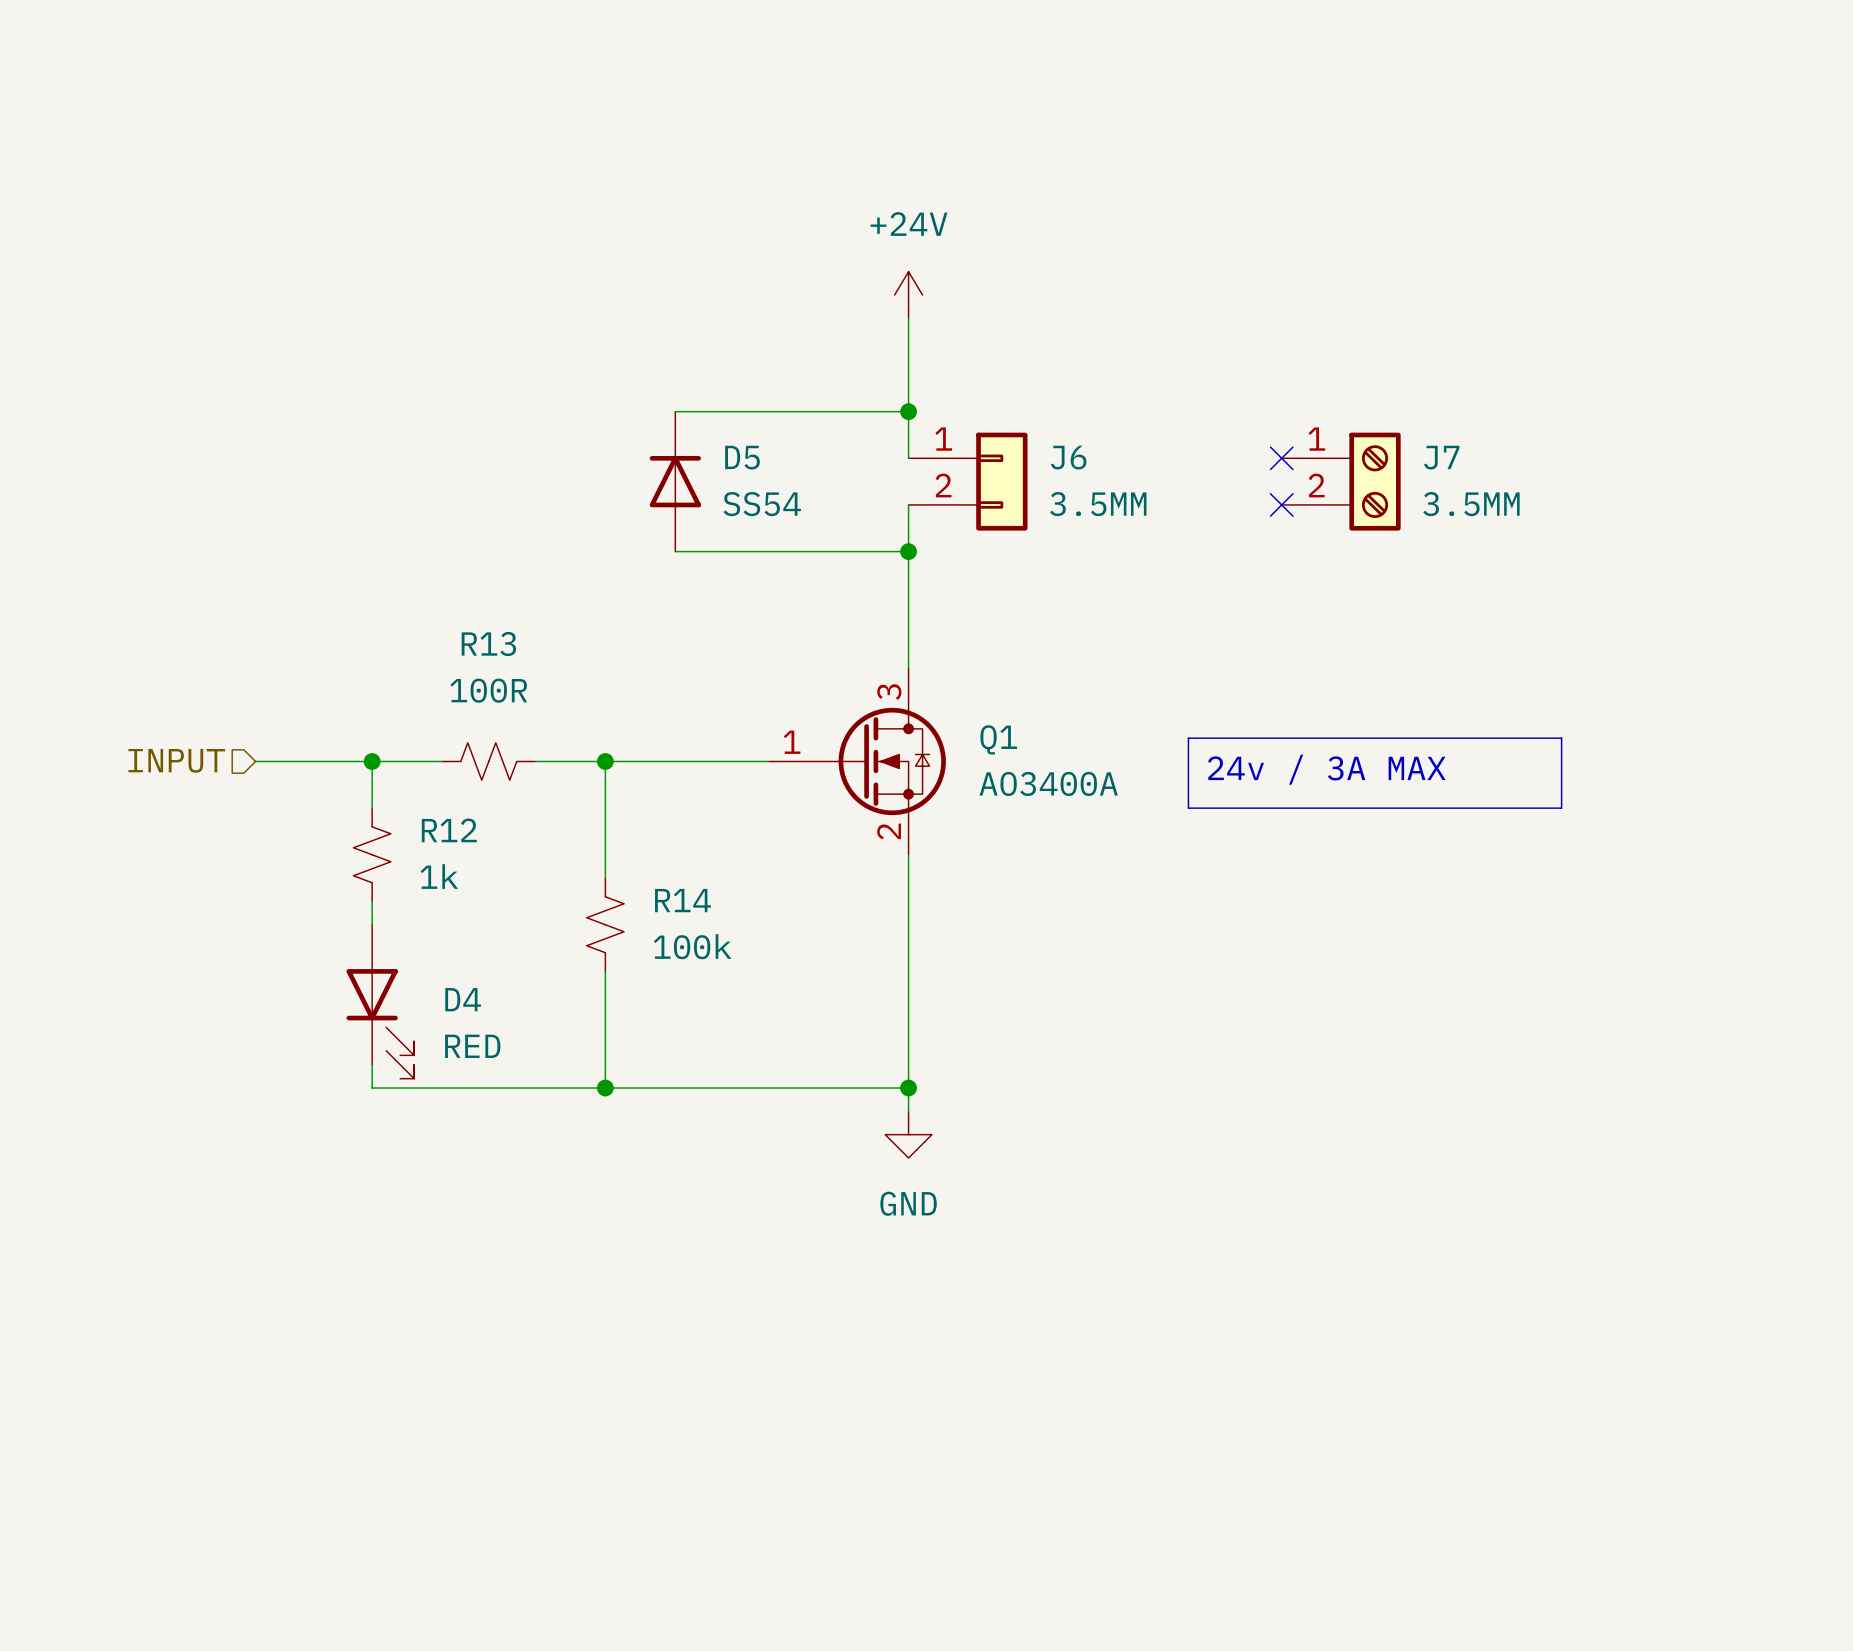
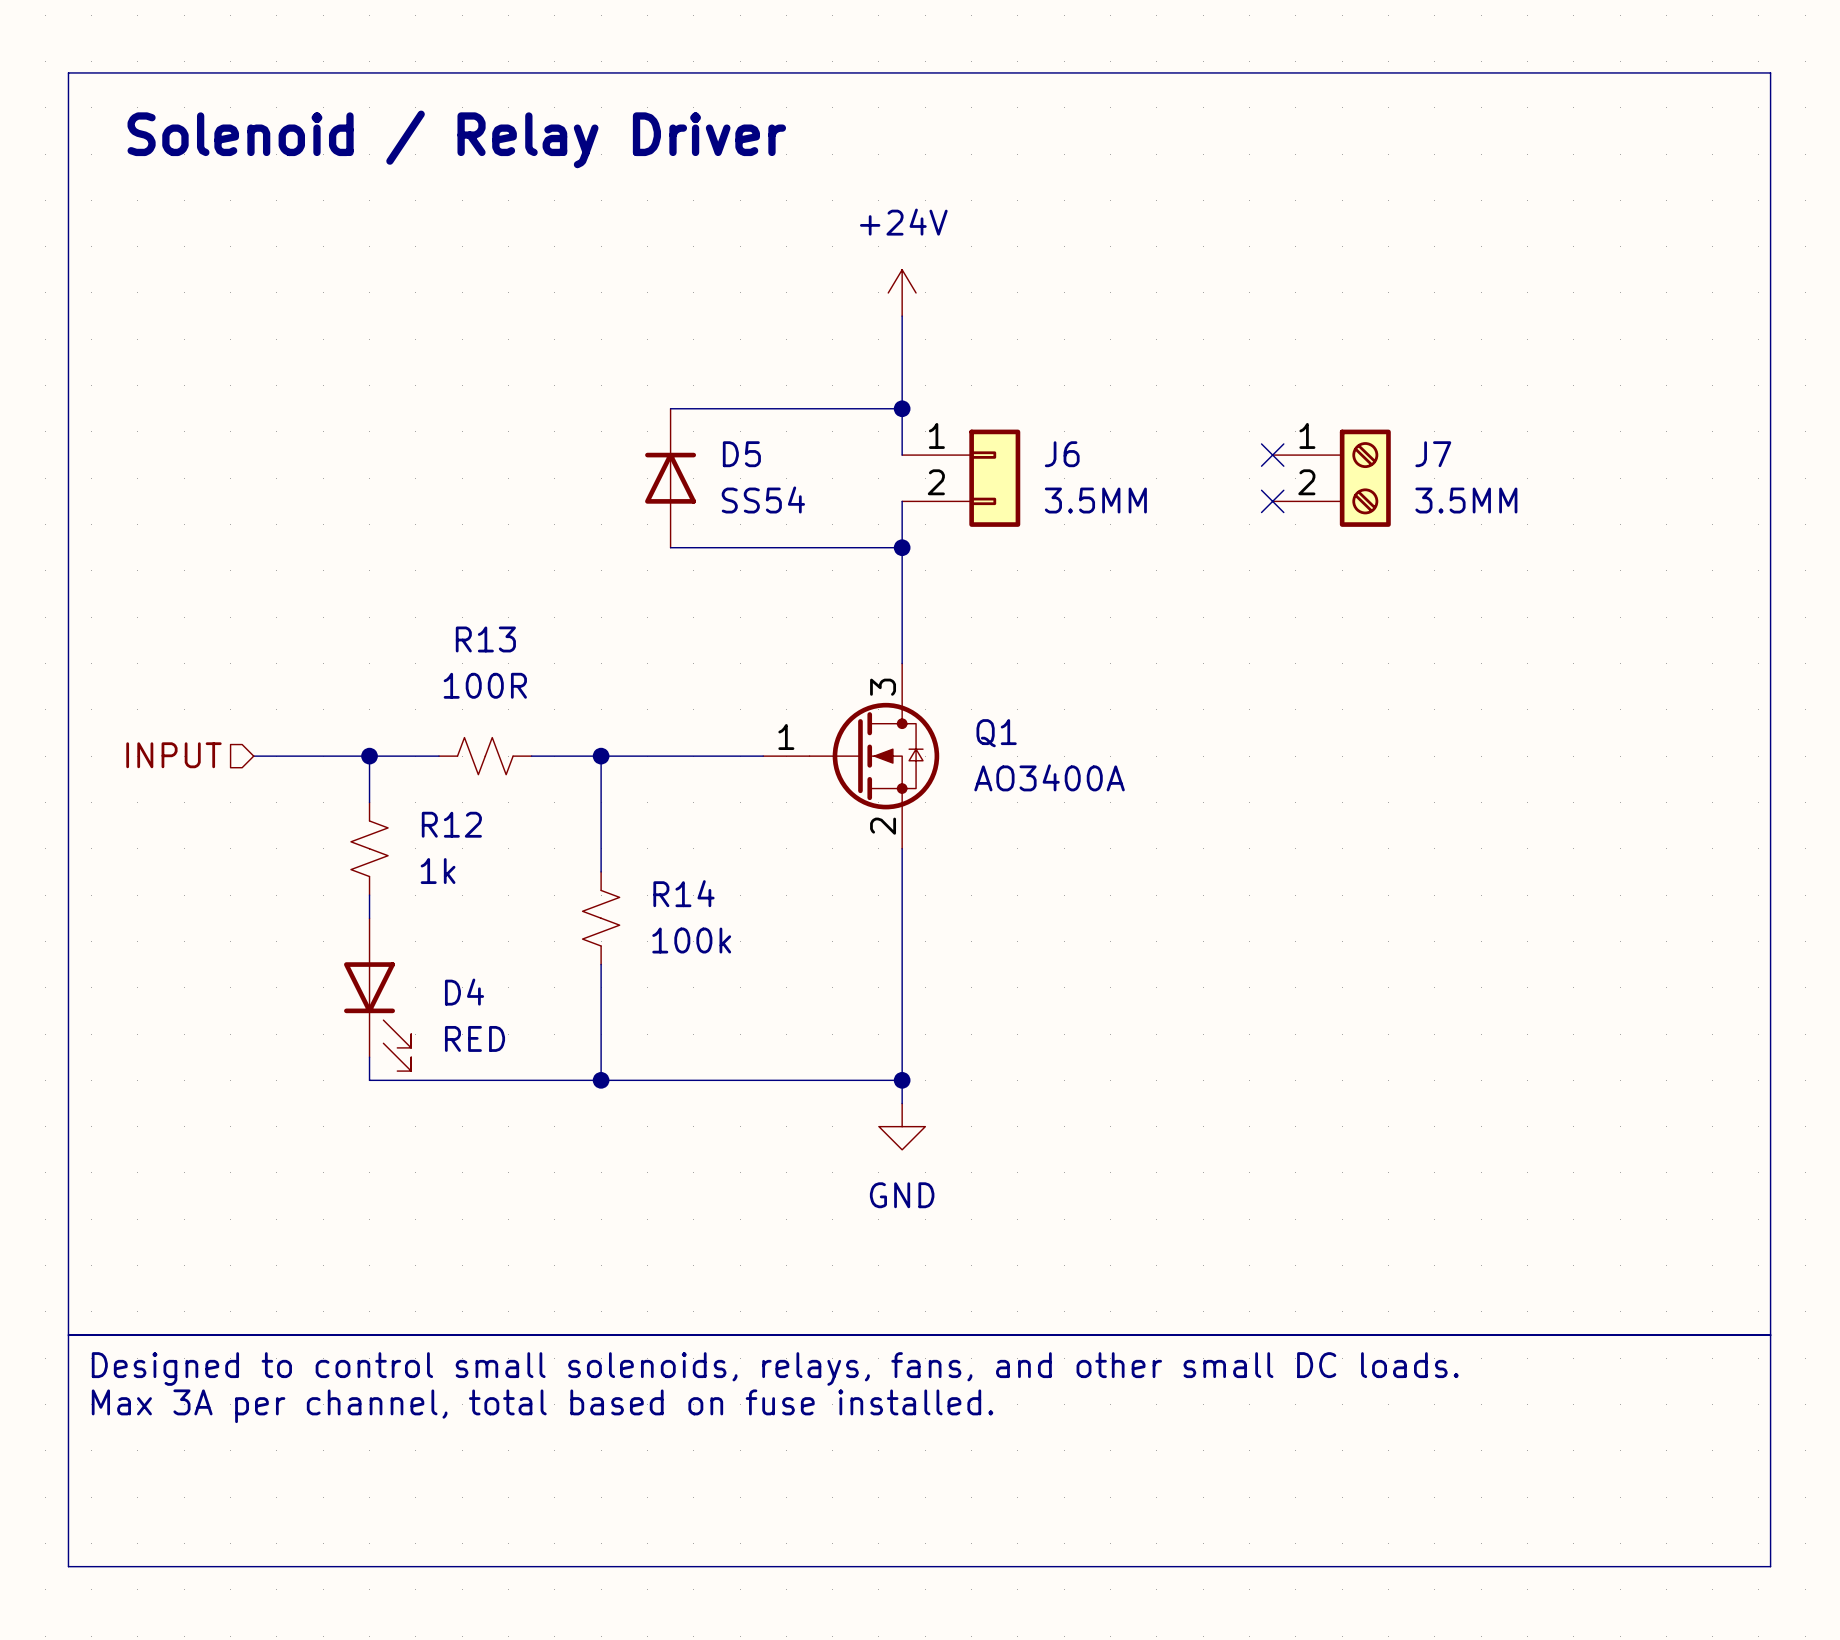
line: none -> (68, 72) (1770, 72) (1770, 1566) (68, 1566) (68, 72)
text: none -> Solenoid / Relay Driver (456, 139)
line: (1188, 738) (1561, 738) (1561, 808) (1188, 808) (1188, 738) -> none
text: 24v / 3A MAX (1326, 769) -> none
line: none -> (68, 1335) (1770, 1335)
text: none -> Designed to control small solenoids, relays, fans, and other small DC loads. (775, 1368)
text: none -> Max 3A per channel, total based on fuse installed. (542, 1406)

